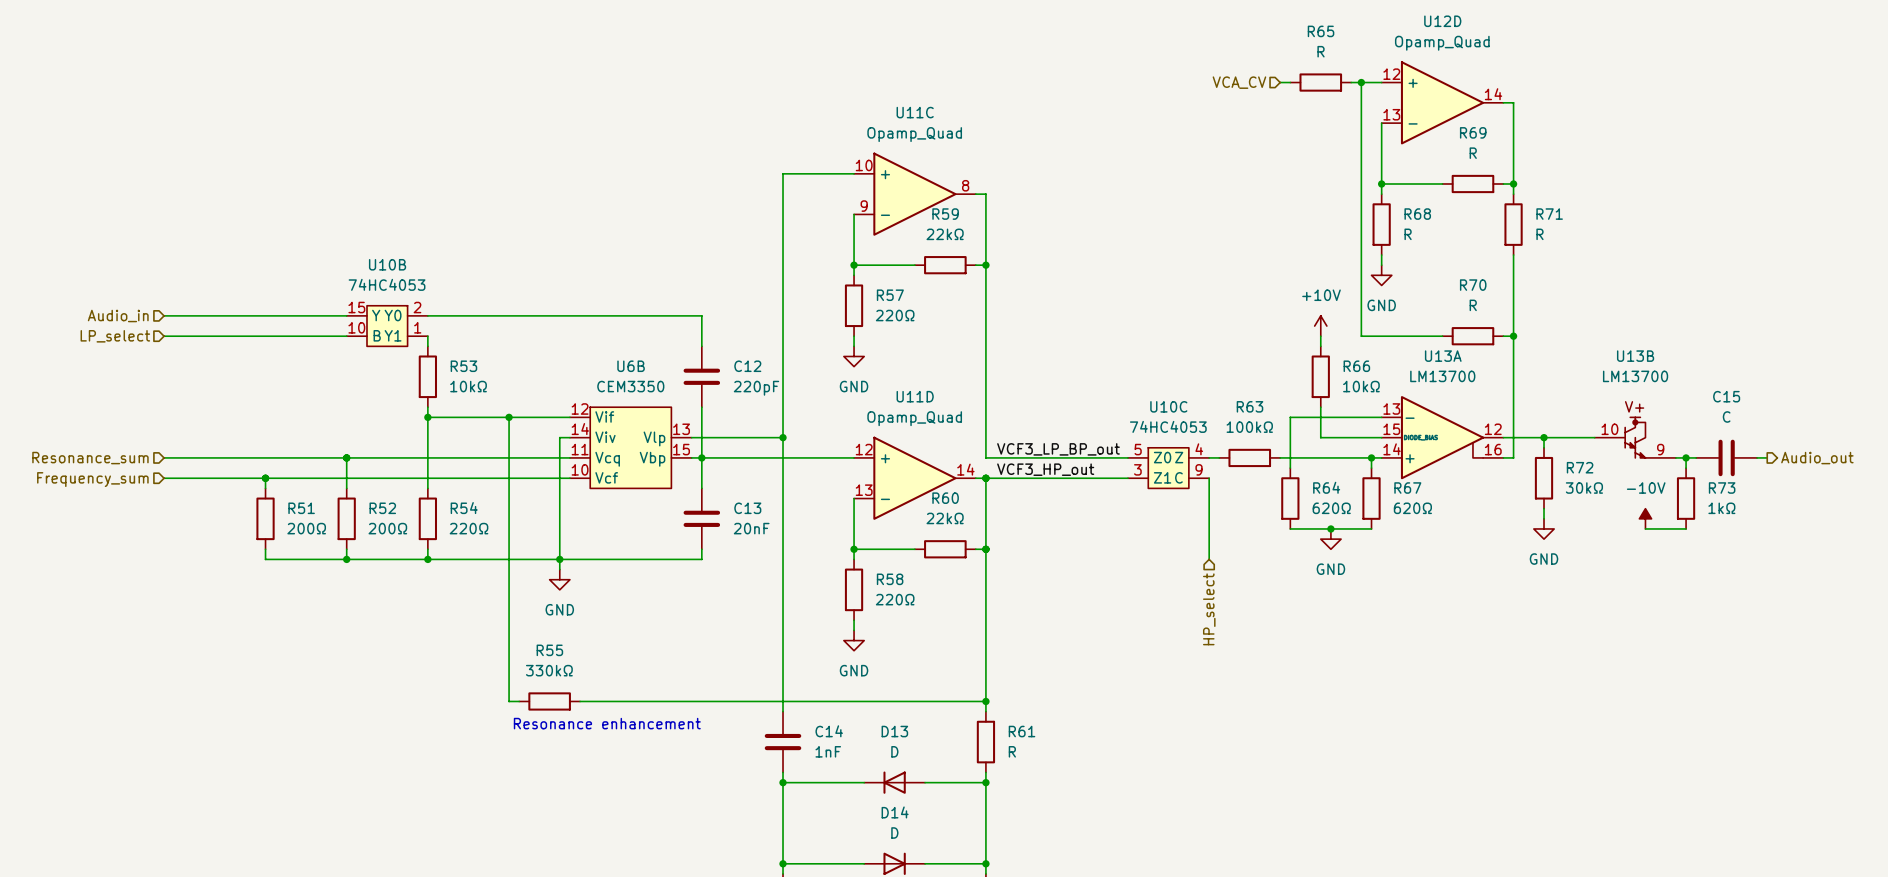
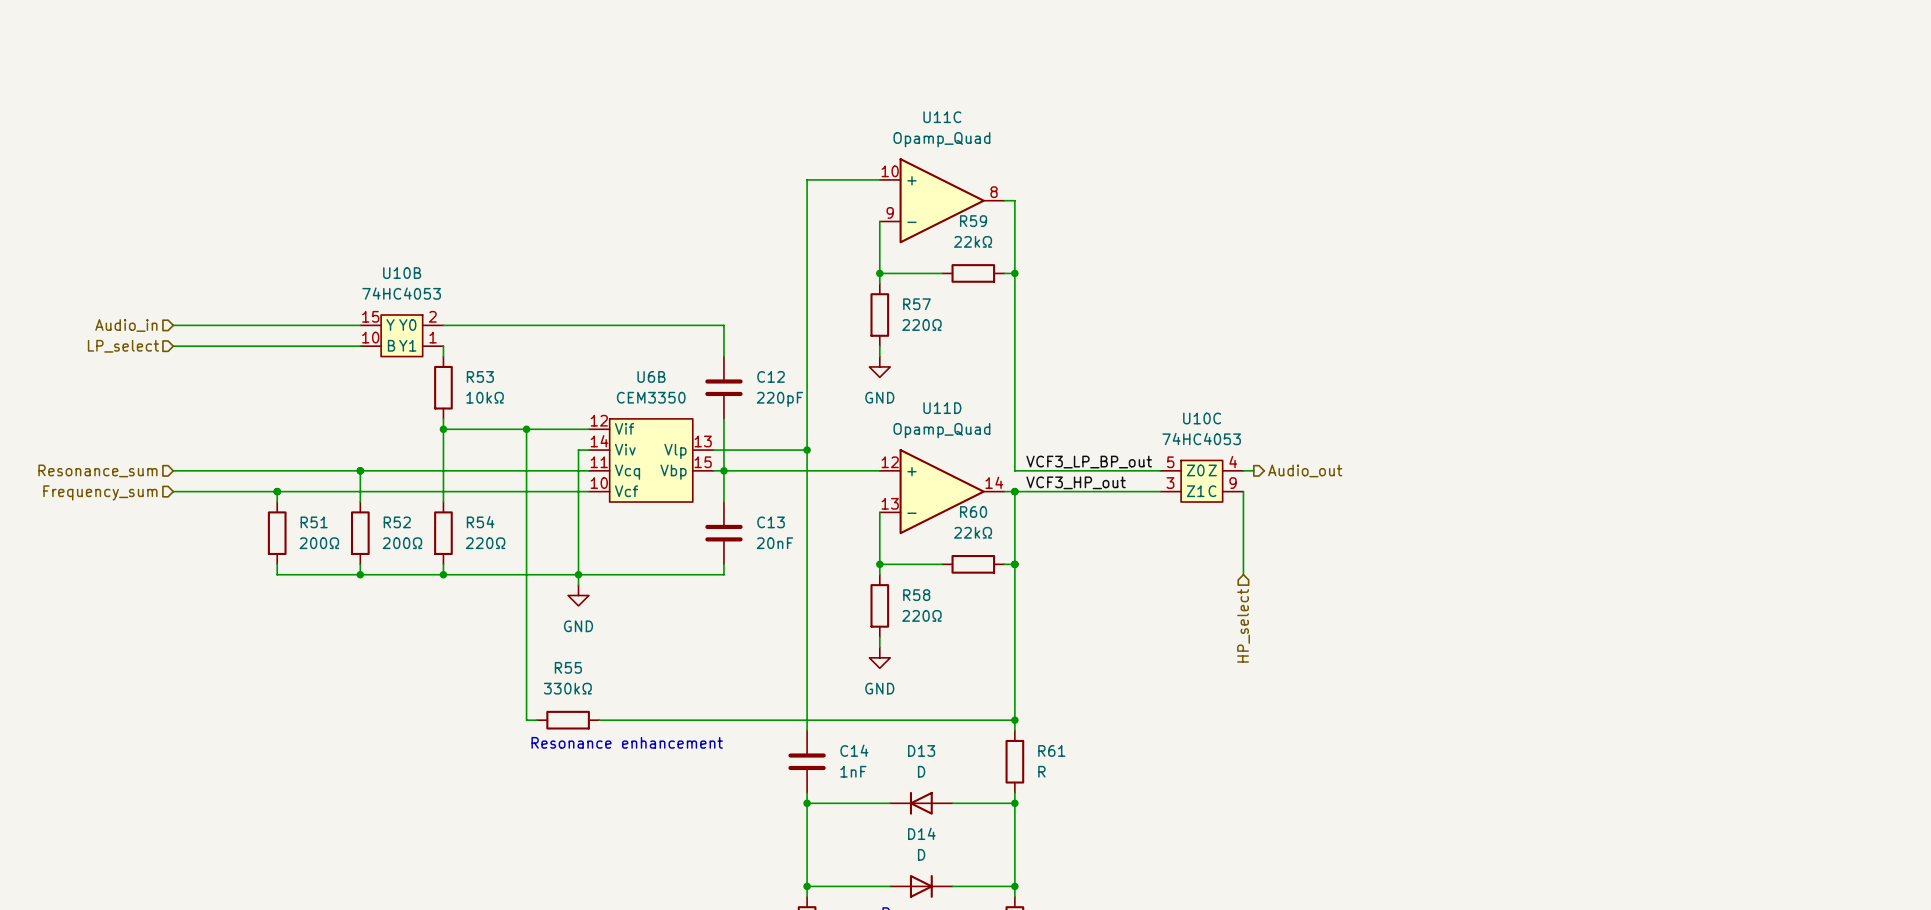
hierarchical label: VCA_CV (1239, 82) -> none
wire: (1280, 82) (1290, 82) -> none
R65: R (1320, 82) -> none
wire: (1351, 82) (1381, 82) -> none
wire: (1361, 82) (1361, 336) (1442, 336) -> none
junction: (1361, 82) -> none
U12D: Opamp_Quad (1442, 102) -> none
wire: (1503, 102) (1513, 102) (1513, 194) -> none
wire: (1381, 123) (1381, 194) -> none
wire: (1381, 183) (1442, 183) -> none
junction: (1381, 183) -> none
R69: R (1472, 183) -> none
wire: (1503, 183) (1513, 183) -> none
junction: (1513, 183) -> none
R68: R (1381, 224) -> none
R71: R (1513, 224) -> none
wire: (1381, 255) (1381, 265) -> none
wire: (1513, 255) (1513, 457) (1503, 457) -> none
power symbol: GND (1381, 275) -> none
power symbol: +10V (1320, 326) -> none
wire: (1320, 336) (1320, 346) -> none
R70: R (1472, 336) -> none
wire: (1503, 336) (1513, 336) -> none
junction: (1513, 336) -> none
R66: 10kΩ (1320, 376) -> none
wire: (1320, 407) (1320, 437) (1381, 437) -> none
wire: (1381, 417) (1290, 417) (1290, 468) -> none
U13A: LM13700 (1442, 437) -> none
wire: (1503, 437) (1594, 437) -> none
wire: (1544, 437) (1544, 447) -> none
junction: (1544, 437) -> none
U13B: LM13700 (1635, 437) -> none
R63: 100kΩ (1249, 457) -> none
wire: (1280, 457) (1381, 457) -> none
wire: (1371, 457) (1371, 468) -> none
junction: (1371, 457) -> none
wire: (1675, 457) (1696, 457) -> none
wire: (1686, 457) (1686, 468) -> none
junction: (1686, 457) -> none
C15: C (1726, 457) -> none
wire: (1757, 457) (1767, 457) -> none
hierarchical label: none -> Audio_out (1305, 470)
hierarchical label: Audio_out (1817, 458) -> none
R72: 30kΩ (1544, 478) -> none
R64: 620Ω (1290, 498) -> none
R67: 620Ω (1371, 498) -> none
R73: 1kΩ (1686, 498) -> none
wire: (1544, 508) (1544, 518) -> none
power symbol: -10V (1645, 518) -> none
wire: (1290, 528) (1371, 528) -> none
junction: (1330, 528) -> none
power symbol: GND (1544, 528) -> none
wire: (1645, 528) (1686, 528) -> none
power symbol: GND (1330, 539) -> none

